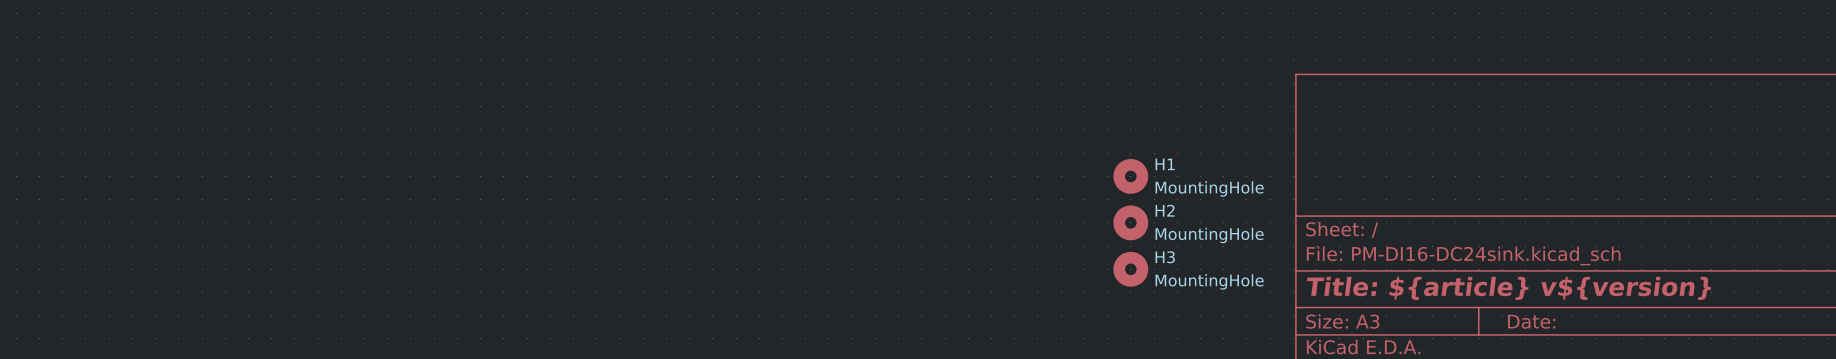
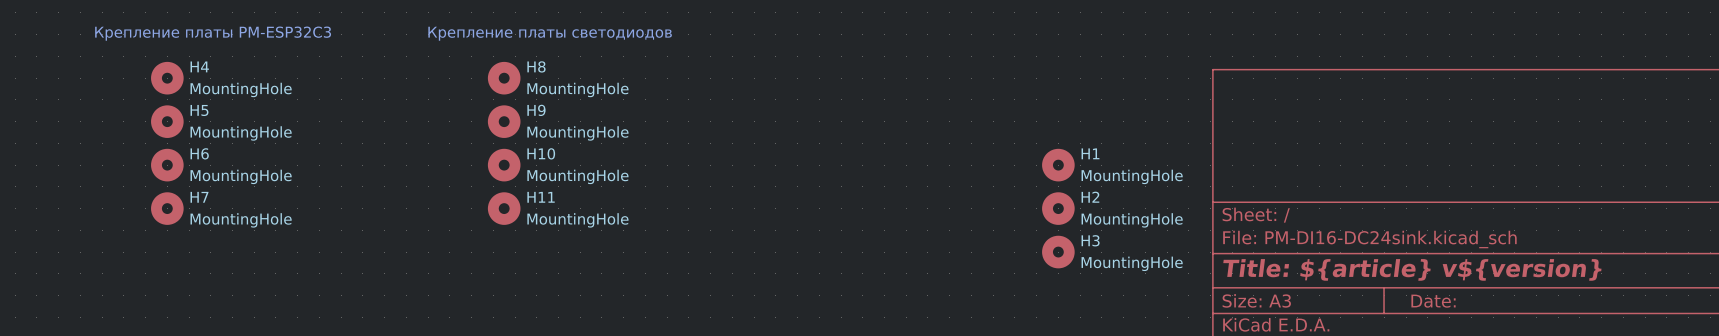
text: none -> Крепление платы PM-ESP32C3 (213, 33)
text: none -> Крепление платы светодиодов (550, 33)
H4: none -> MountingHole (167, 78)
H8: none -> MountingHole (504, 78)
H5: none -> MountingHole (167, 121)
H9: none -> MountingHole (504, 121)
H6: none -> MountingHole (167, 165)
H10: none -> MountingHole (504, 165)
H7: none -> MountingHole (167, 208)
H11: none -> MountingHole (504, 208)

